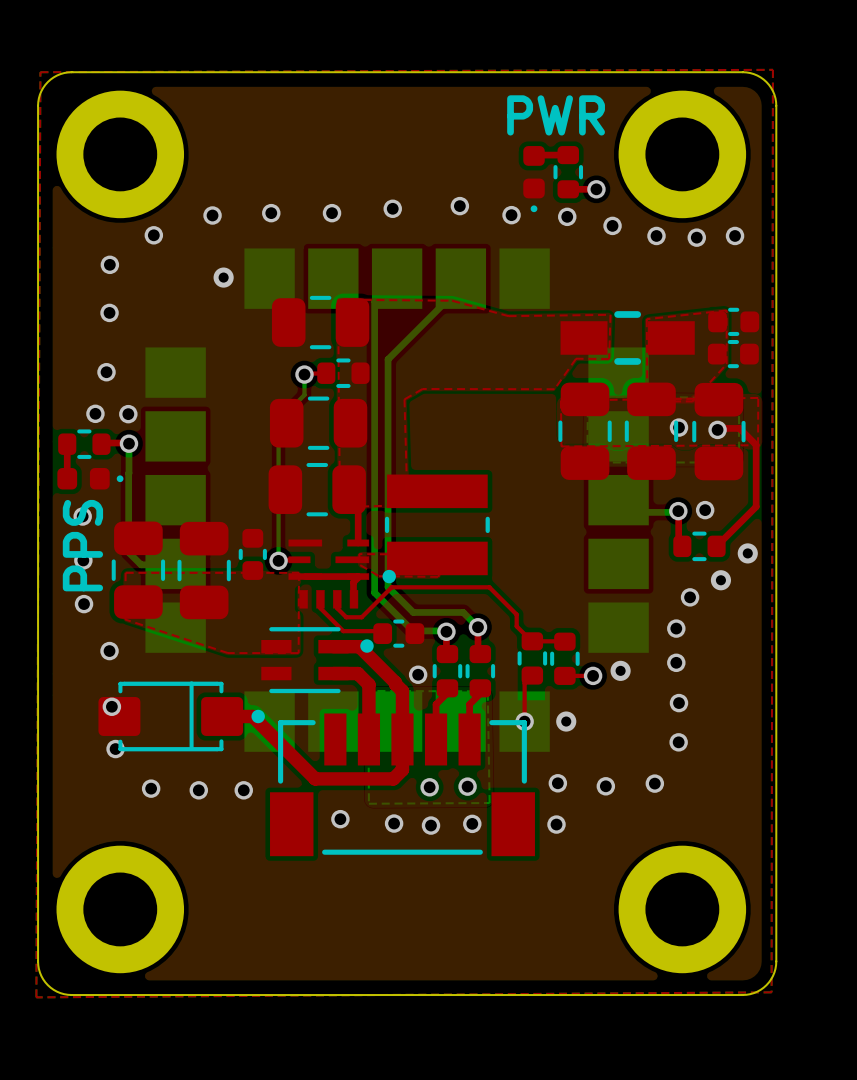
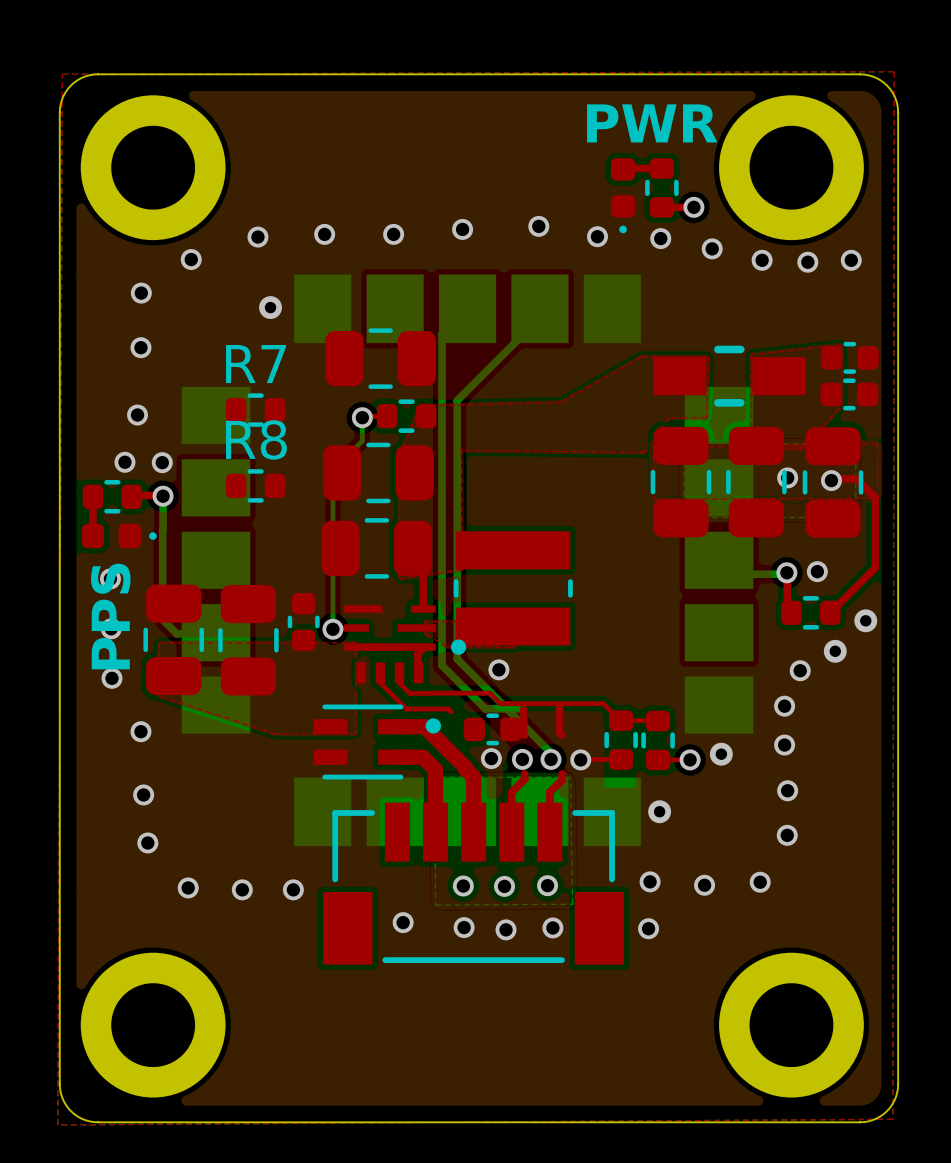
top zone outline: (338, 299) (340, 507) (407, 505) (404, 399) (422, 388) (554, 389) (576, 358) (609, 359) (610, 314) (508, 316) (452, 300) (338, 299) -> (641, 356) (561, 402) (420, 405) (399, 456) (399, 578) (462, 569) (461, 448) (460, 450) (644, 452) (669, 417) (706, 418) (708, 356) (641, 356)
R7: none -> (255, 410)
R8: none -> (255, 485)
via: none -> (498, 669)
bottom track: (413, 612) (463, 612) (477, 627) -> (485, 687) (551, 753) (551, 759)
top track: (361, 617) (391, 587) (489, 587) (516, 614) (516, 626) -> (427, 693) (490, 693) (500, 703) (603, 703)
via: (477, 627) -> none
via: (446, 631) -> none
part position: (398, 633) -> (492, 729)
part: (447, 671) -> none
part: (480, 671) -> none
via: none -> (522, 759)
via: none -> (551, 759)
via: none -> (580, 759)
top track: (532, 675) (524, 683) (524, 721) -> (621, 759) (581, 759)
part: (181, 716) -> none
top track: (222, 716) (252, 716) (315, 778) (393, 778) (402, 769) (402, 739) -> none
via: (524, 721) -> none
via: none -> (463, 886)

